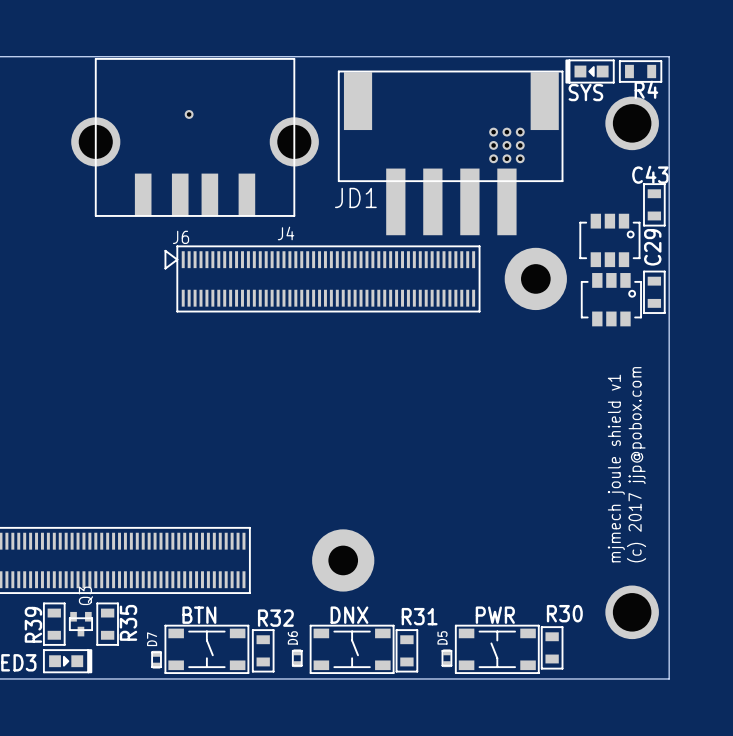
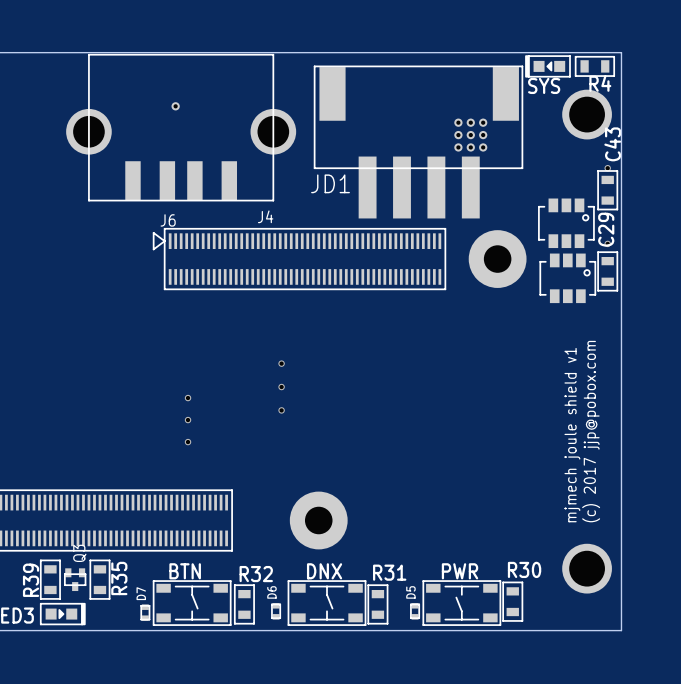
C43 name rotation: 0° (650, 174) -> 90° counterclockwise (612, 144)
via: none -> (607, 168)
via: none -> (607, 243)
via: none -> (281, 363)
via: none -> (281, 387)
via: none -> (188, 398)
via: none -> (281, 410)
via: none -> (188, 420)
via: none -> (188, 442)

